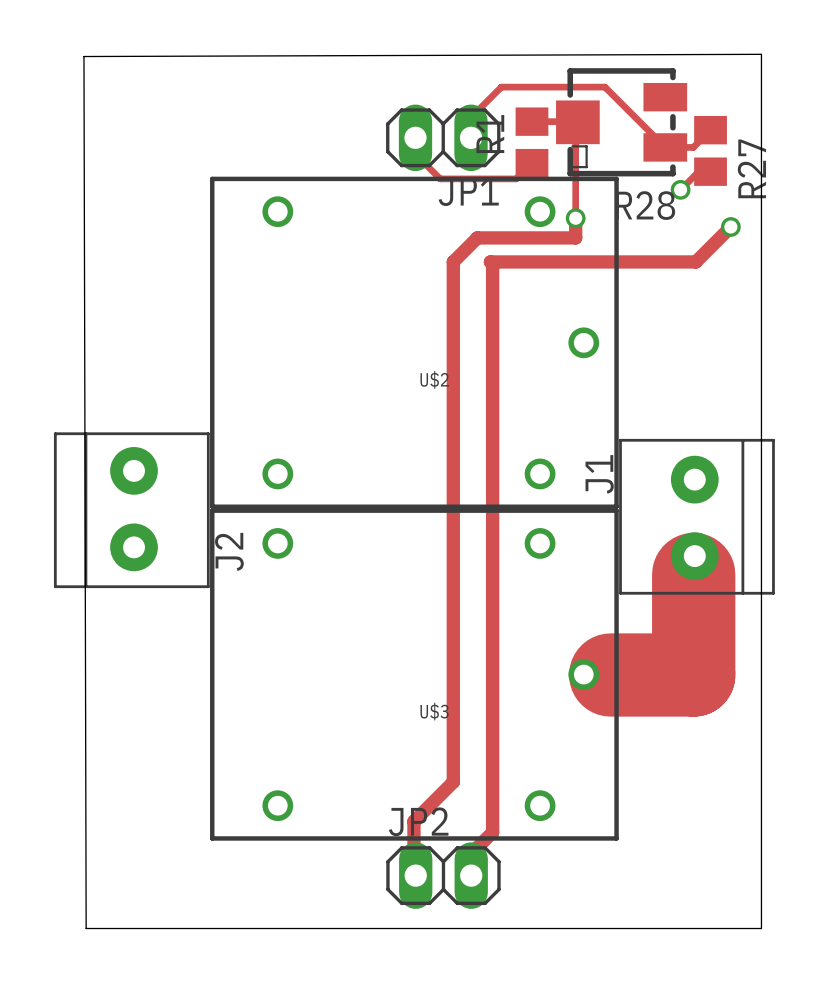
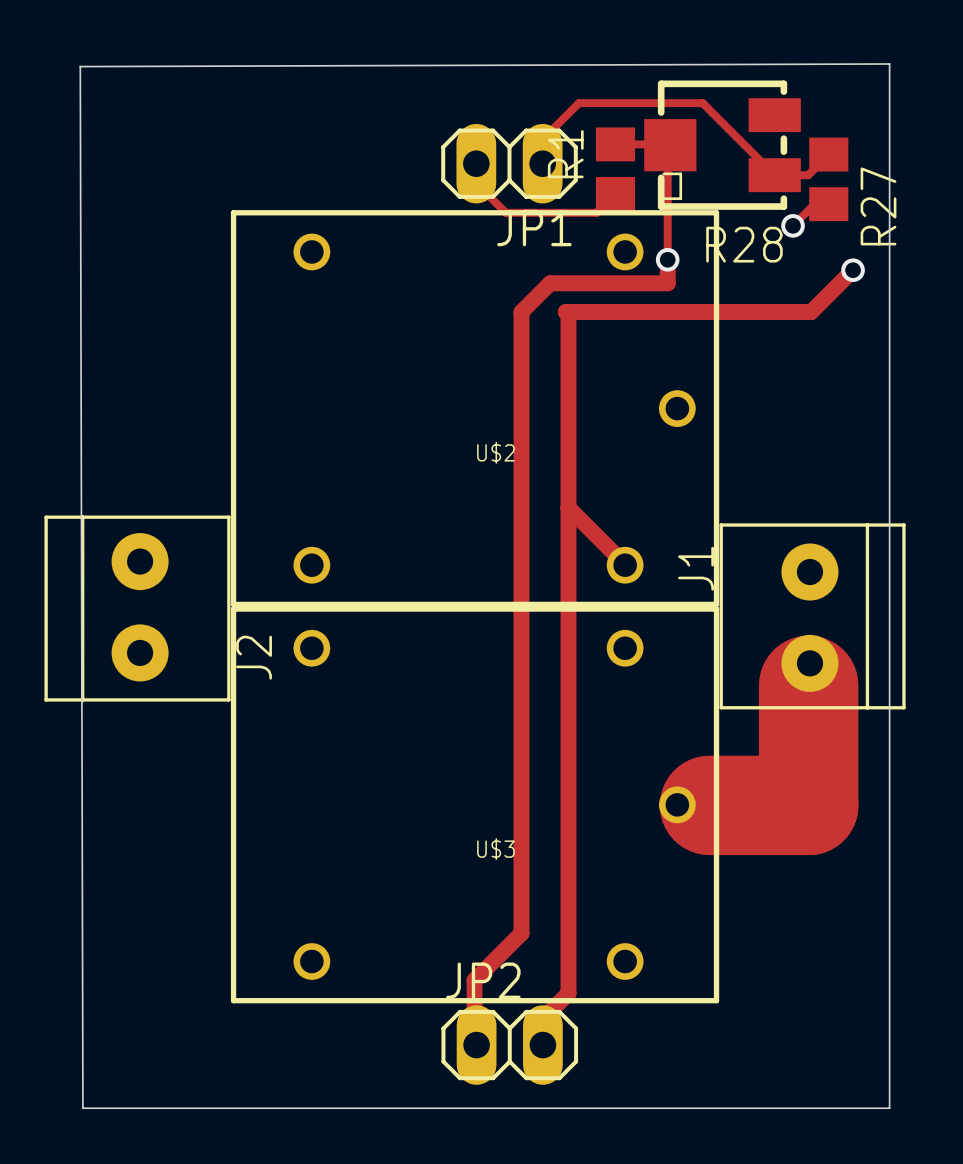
track: none -> (568, 507) (626, 564) (625, 565)

